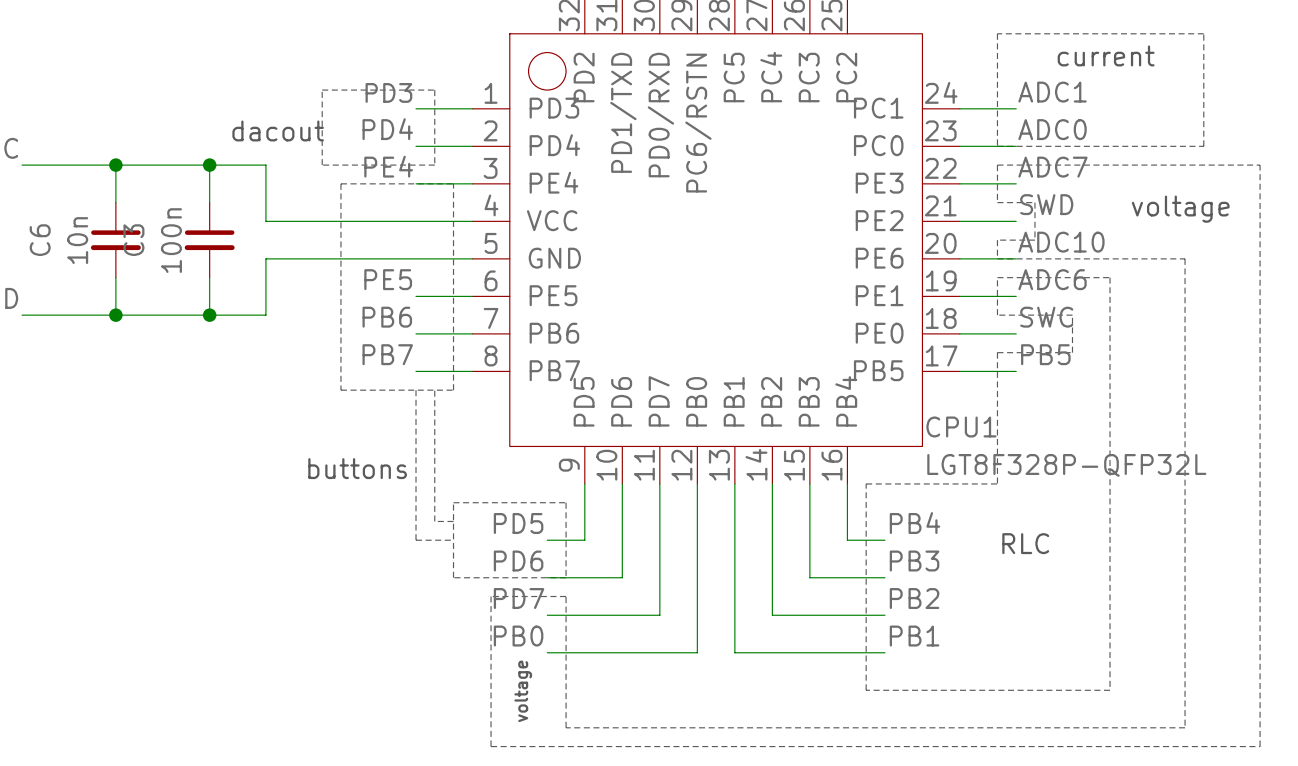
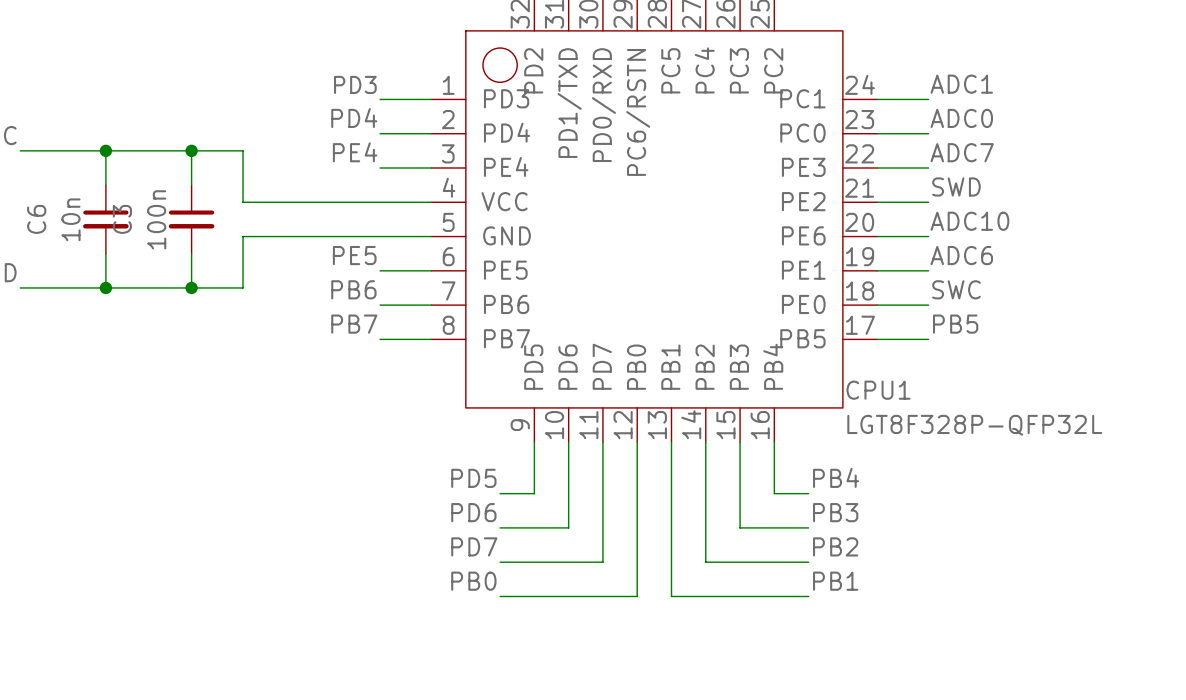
line: (997, 33) (997, 146) (1203, 146) (1203, 33) (997, 33) -> none
text: current (1106, 55) -> none
line: (322, 90) (322, 165) (434, 165) (434, 90) (322, 90) -> none
text: dacout (278, 130) -> none
line: (997, 165) (1260, 165) (1260, 746) (491, 746) (491, 596) (566, 596) (566, 727) (1185, 727) (1185, 258) (997, 258) (997, 240) (1034, 240) (1034, 202) (997, 202) (997, 165) -> none
line: (340, 183) (340, 390) (453, 390) (453, 183) (340, 183) -> none
text: voltage (1180, 209) -> none
line: (997, 277) (997, 315) (1072, 315) (1072, 352) (997, 352) (997, 483) (866, 483) (866, 690) (1110, 690) (1110, 277) (997, 277) -> none
line: (416, 390) (416, 540) (453, 540) -> none
line: (434, 390) (434, 521) (453, 521) -> none
text: buttons (357, 468) -> none
line: (453, 502) (453, 577) (566, 577) (566, 502) (453, 502) -> none
text: RLC (1025, 543) -> none
text: voltage (523, 691) -> none

